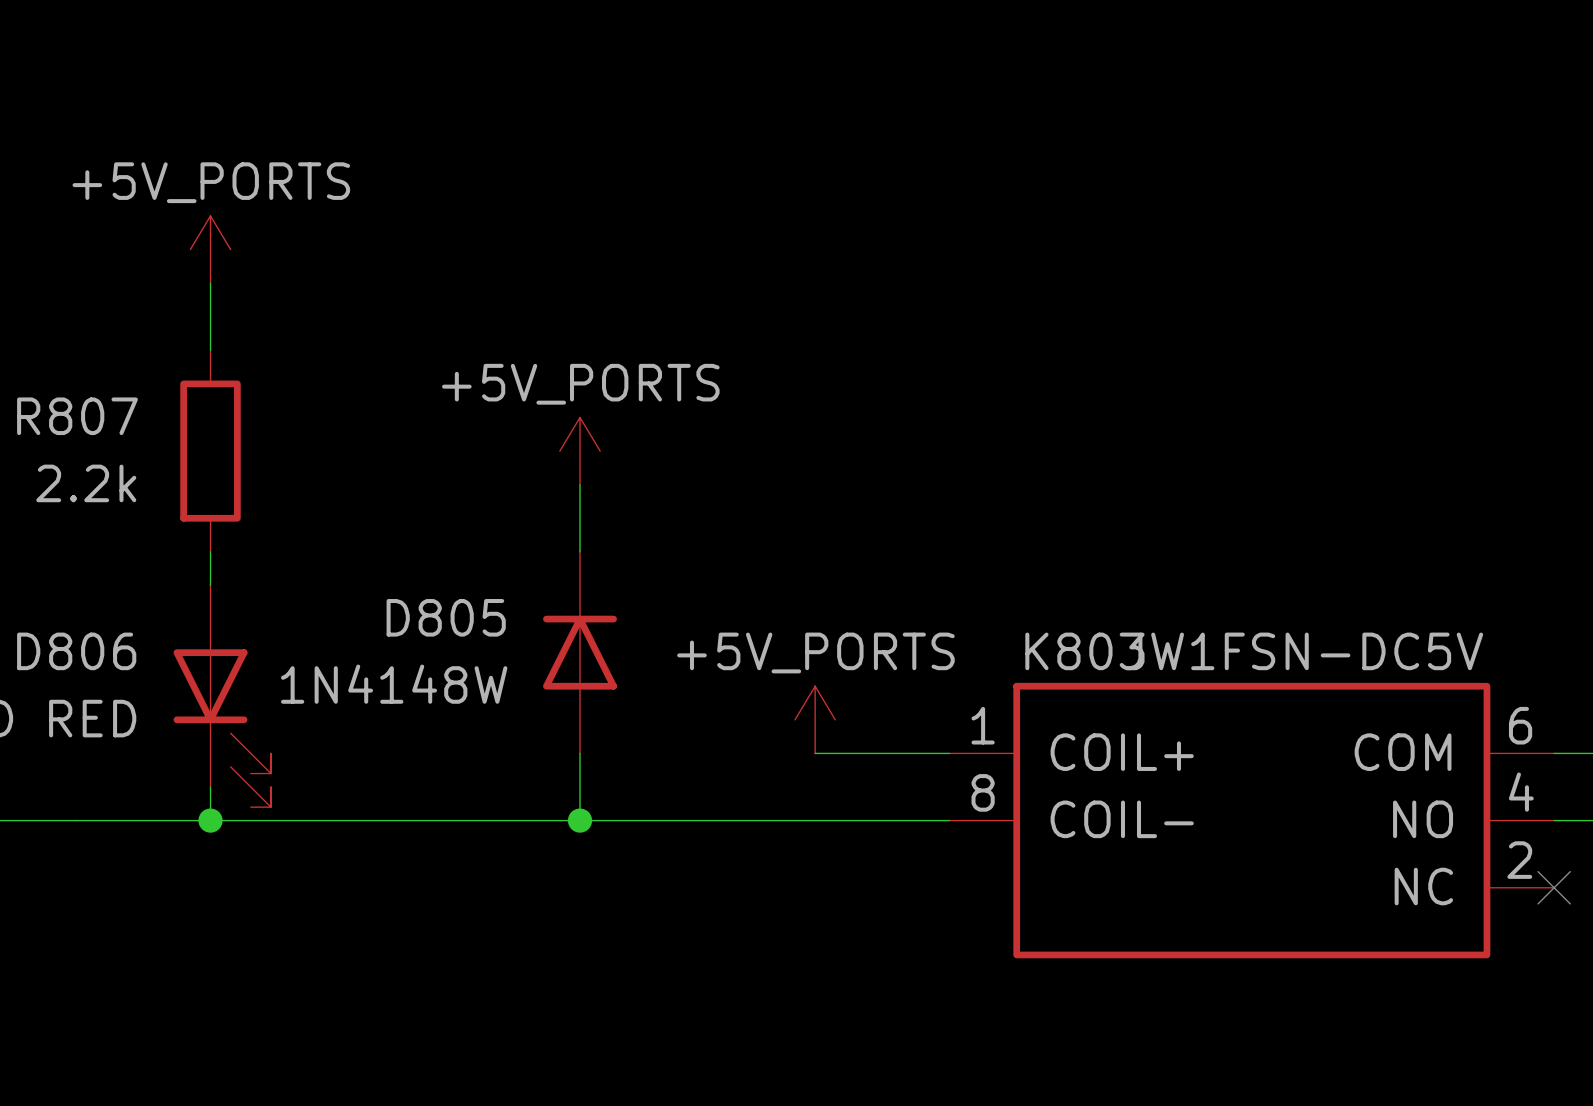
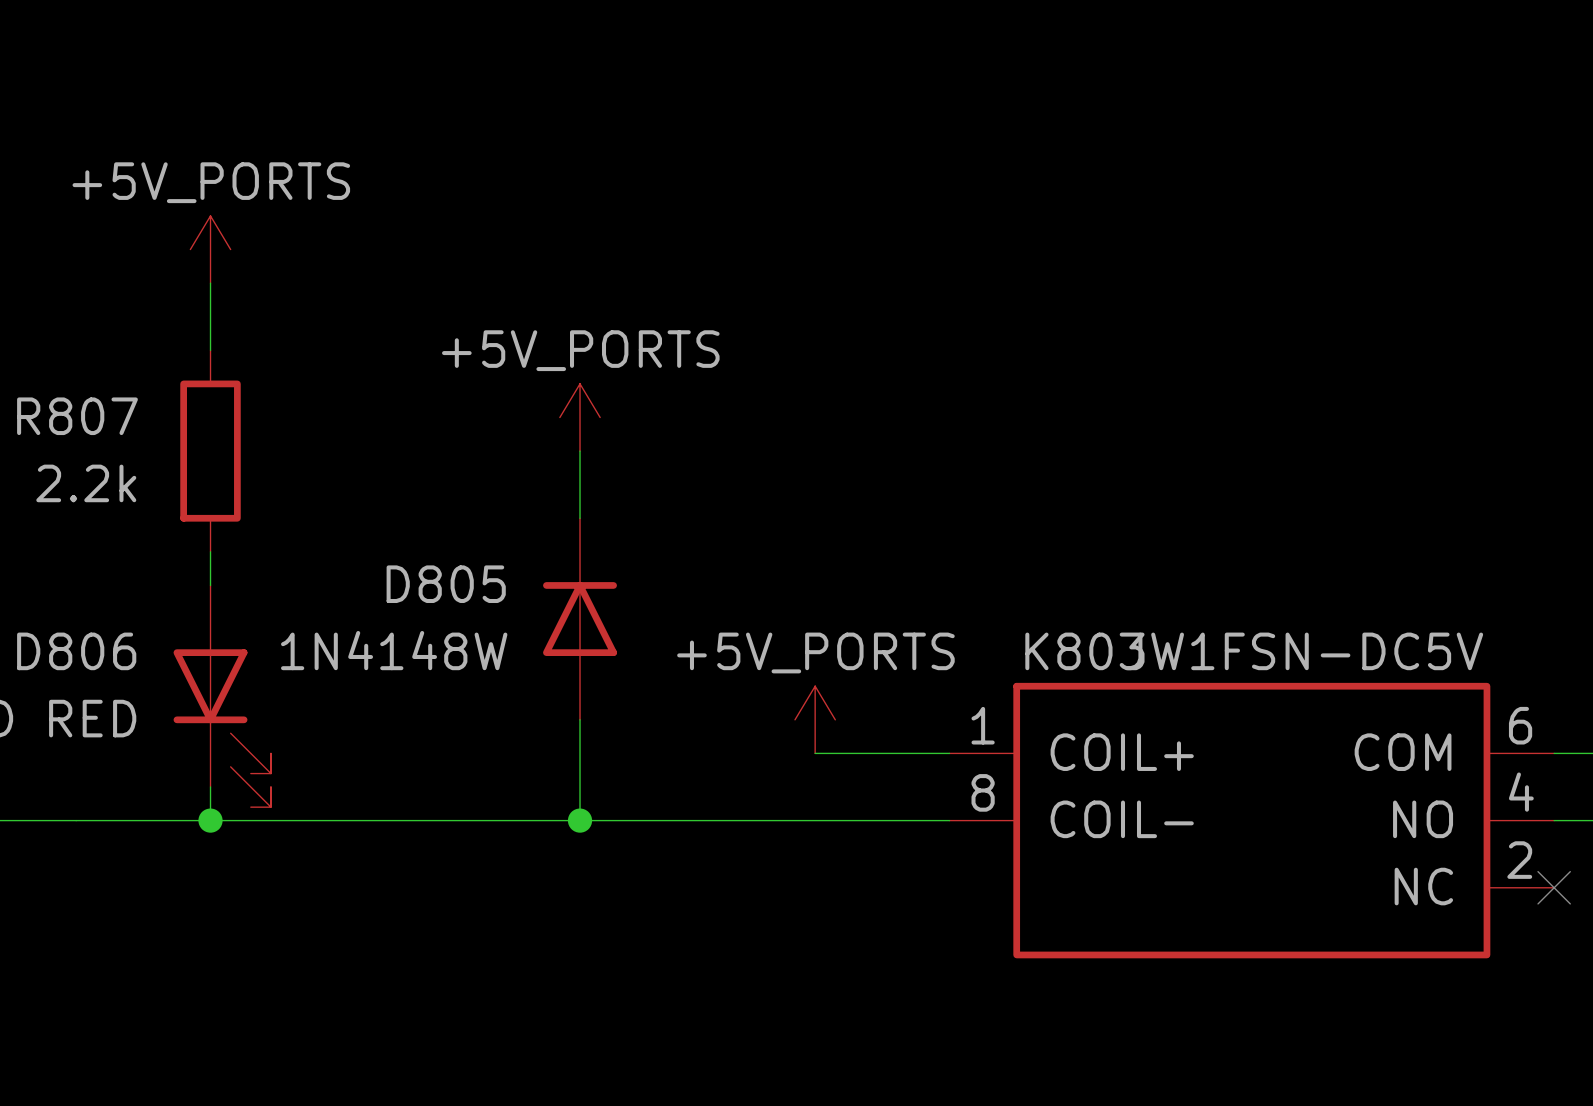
power symbol position: +5V_PORTS (580, 451) -> +5V_PORTS (580, 417)
D805 position: (580, 652) -> (580, 619)

